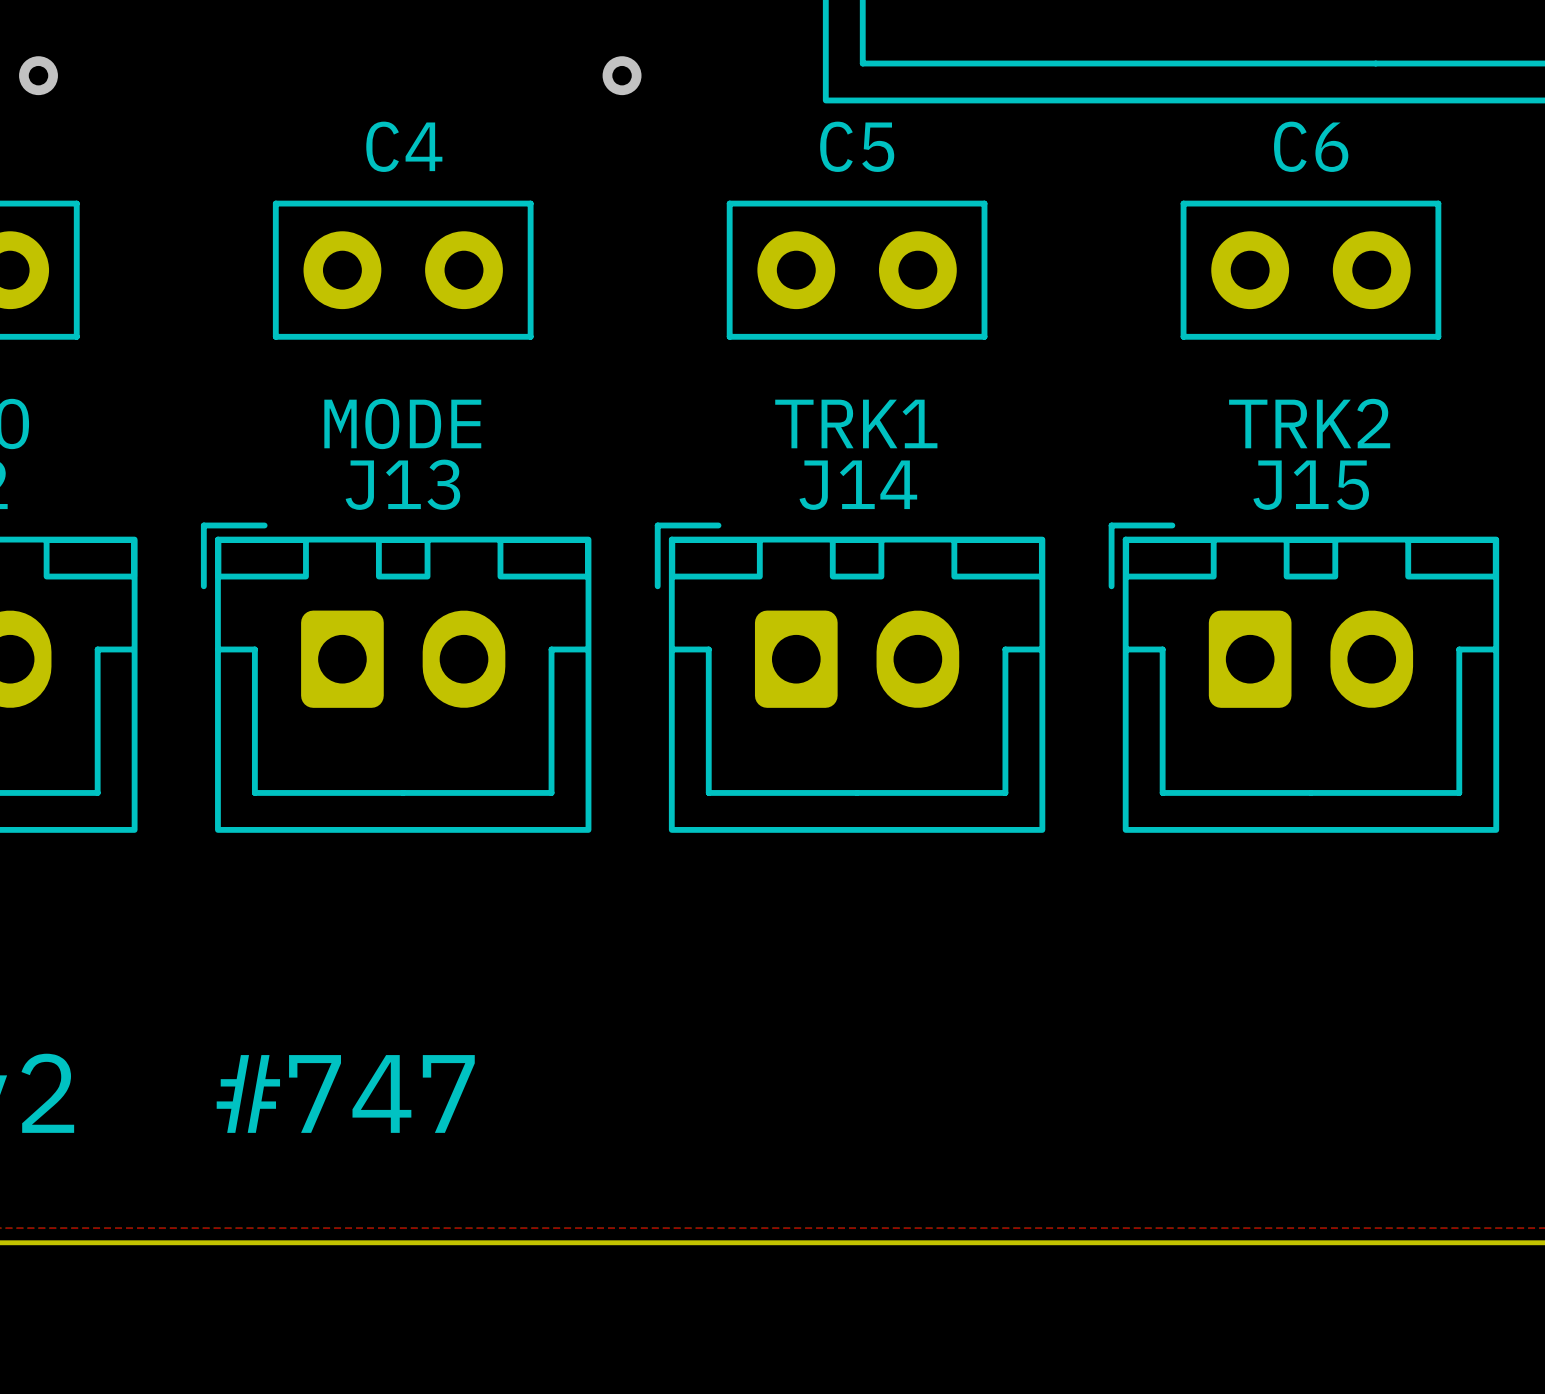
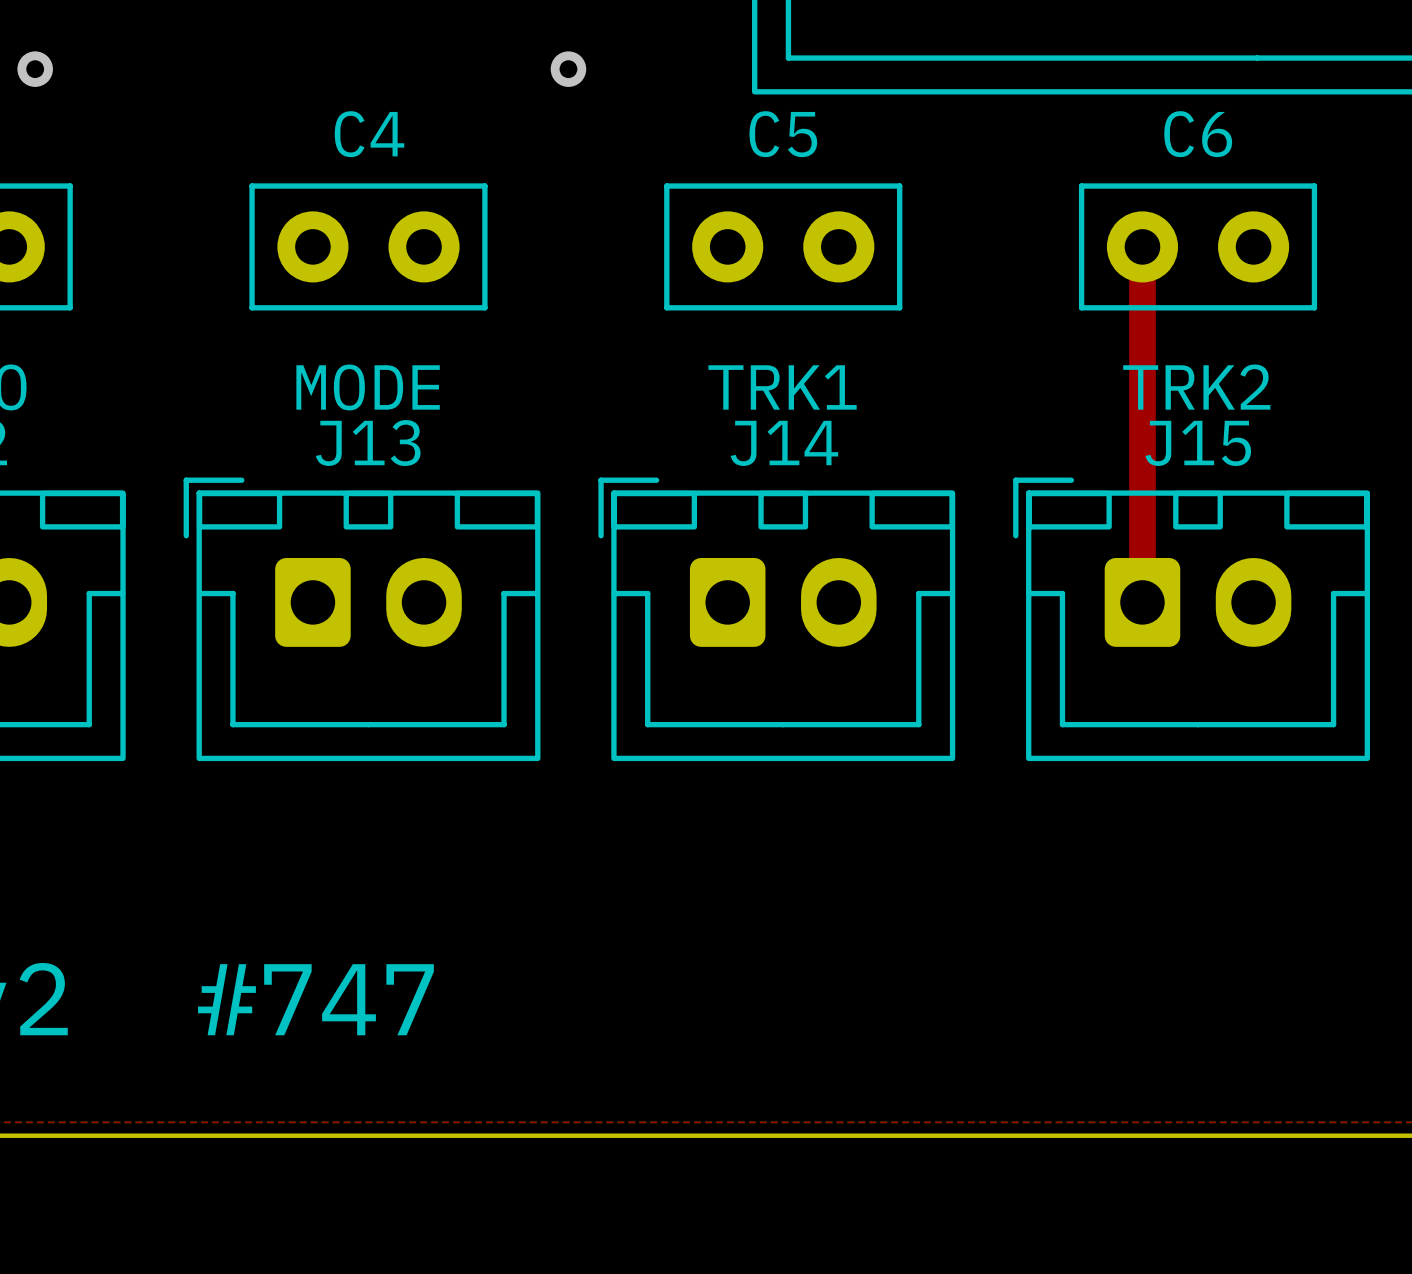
top track: none -> (1142, 246) (1142, 602)

